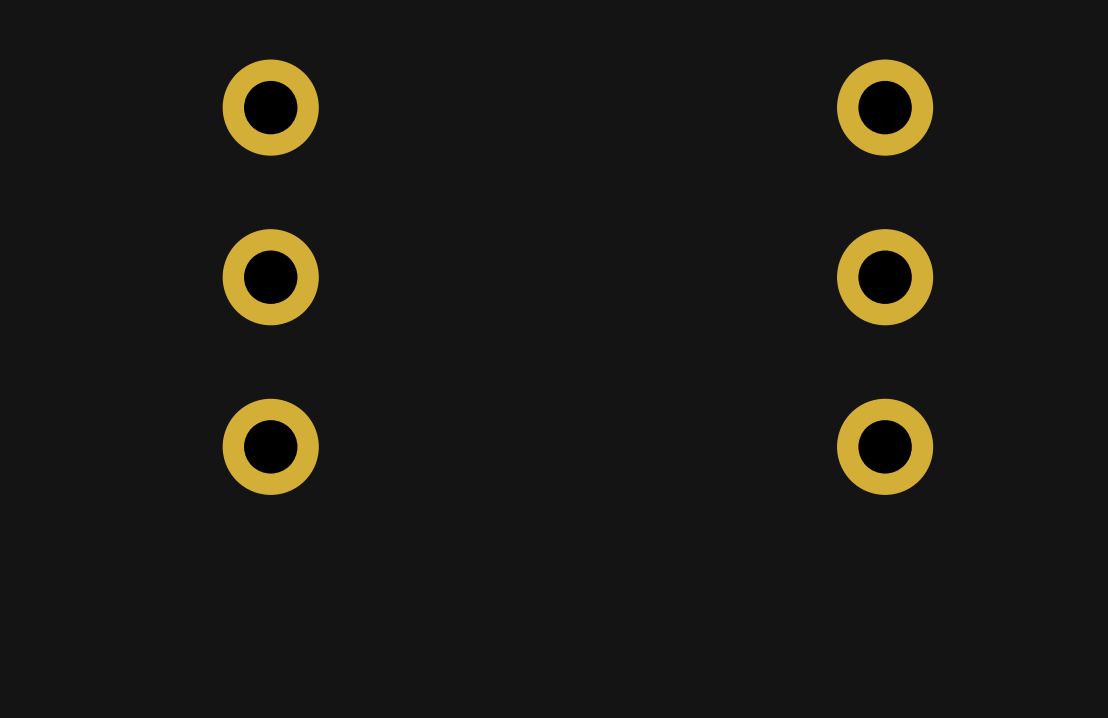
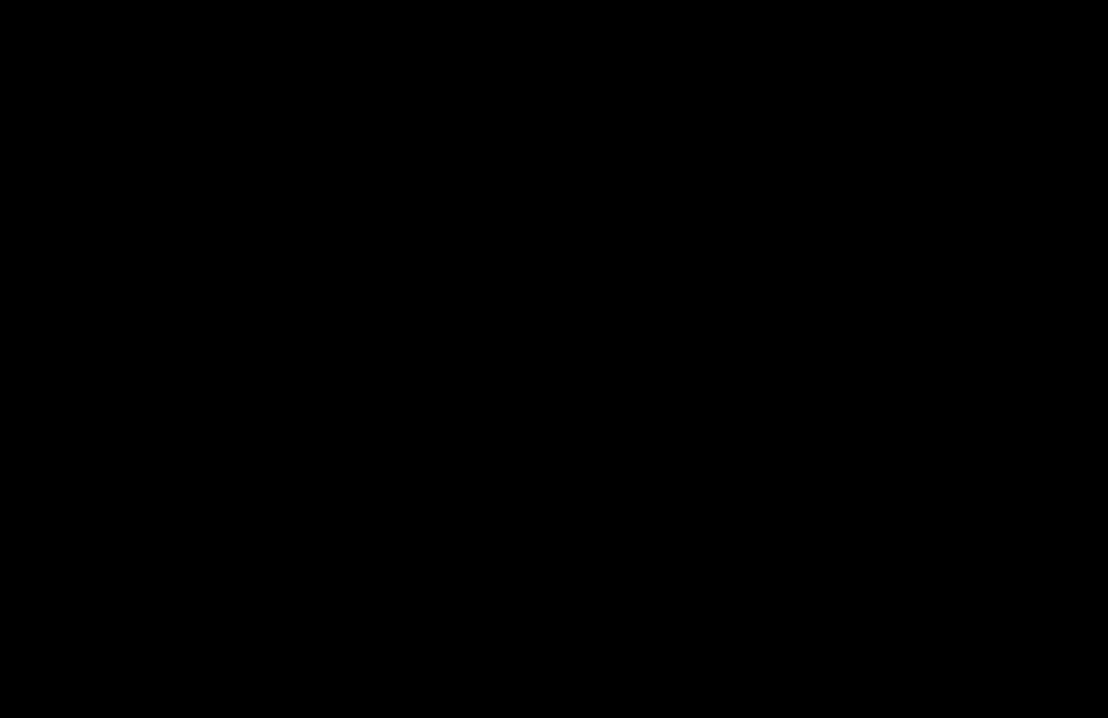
part: (270, 277) -> none
part: (885, 277) -> none

